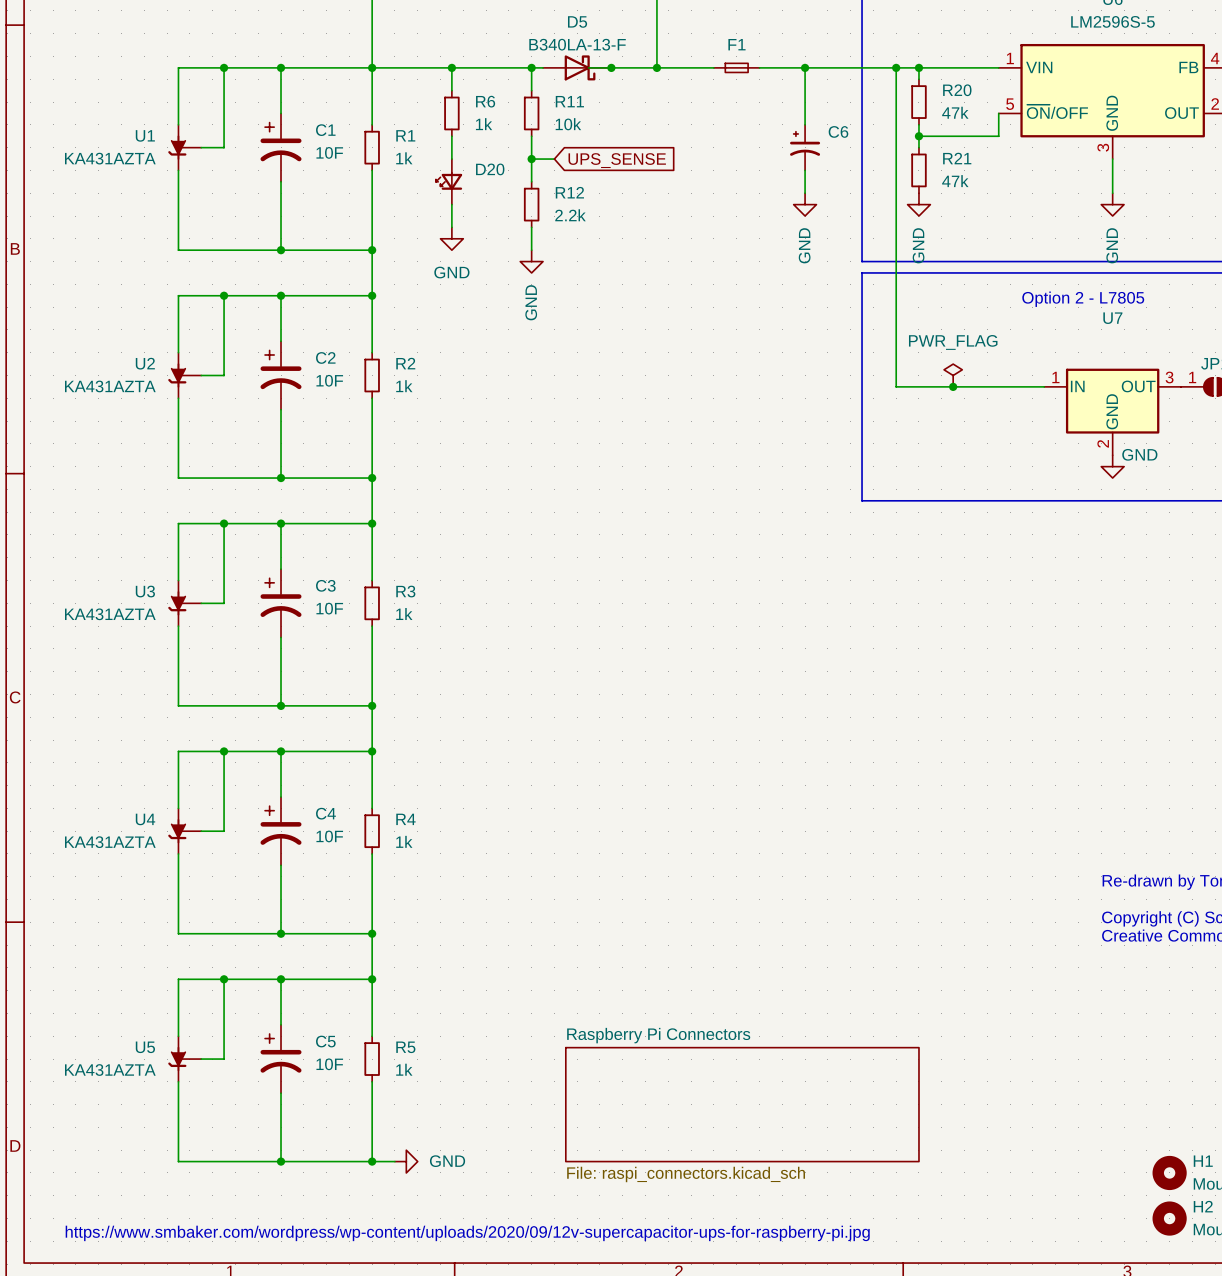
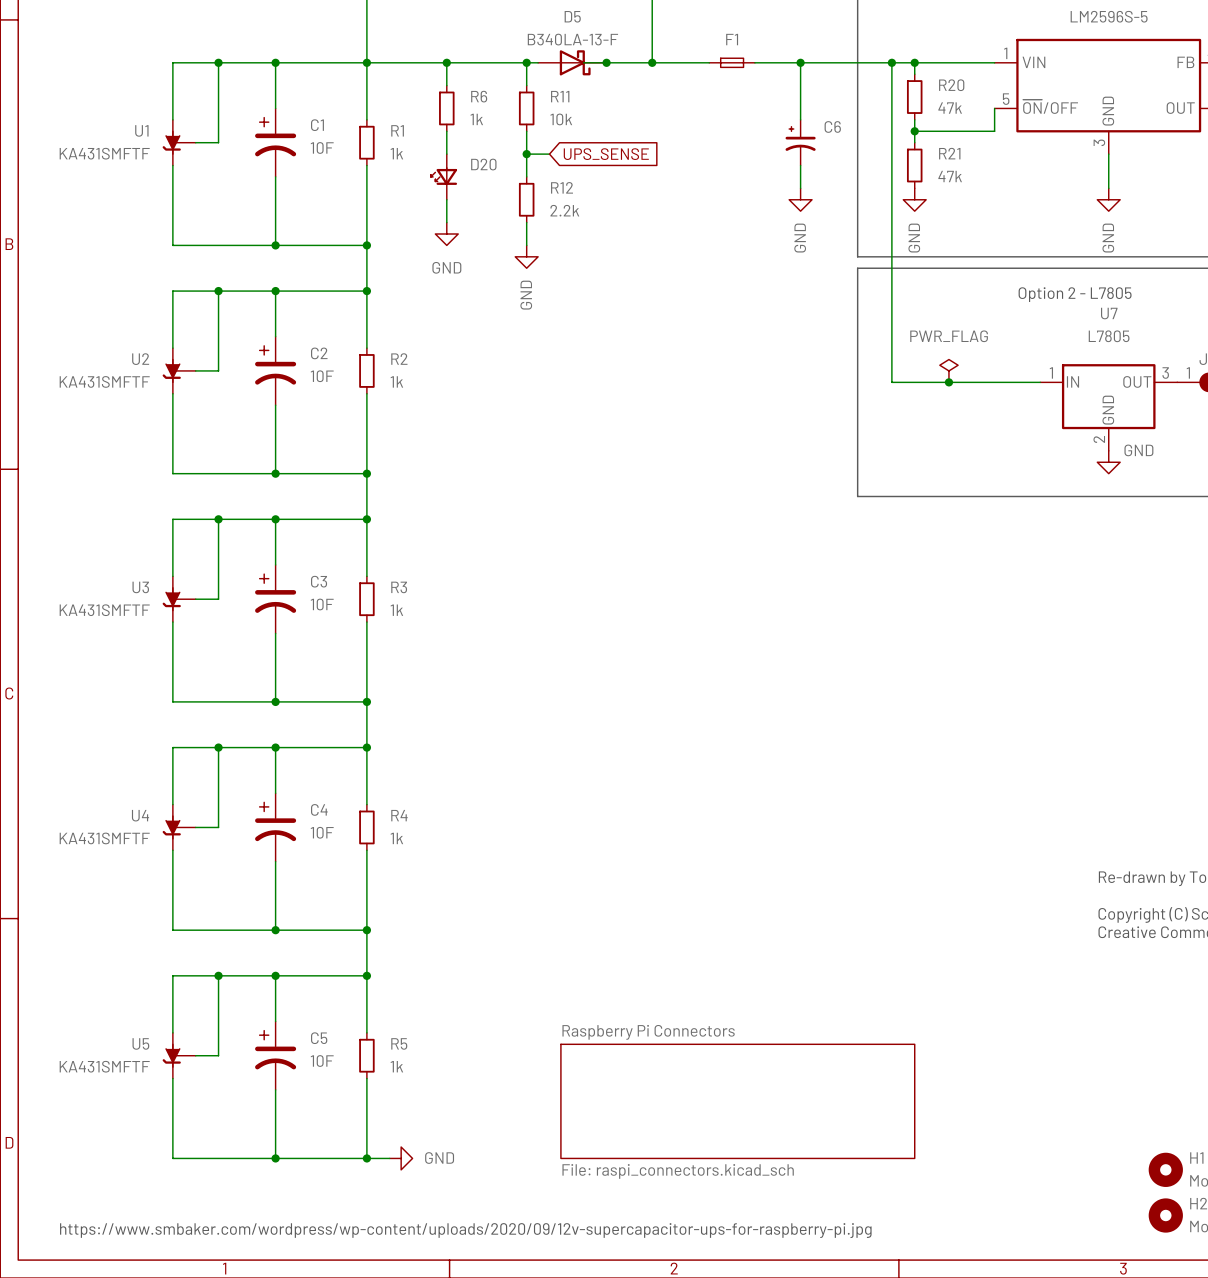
U1 value: KA431AZTA (110, 158) -> KA431SMFTF (104, 153)
U7 value: none -> L7805 (1109, 336)
U2 value: KA431AZTA (110, 386) -> KA431SMFTF (104, 381)
U3 value: KA431AZTA (110, 614) -> KA431SMFTF (104, 610)
U4 value: KA431AZTA (110, 842) -> KA431SMFTF (104, 838)
U5 value: KA431AZTA (110, 1070) -> KA431SMFTF (104, 1066)

